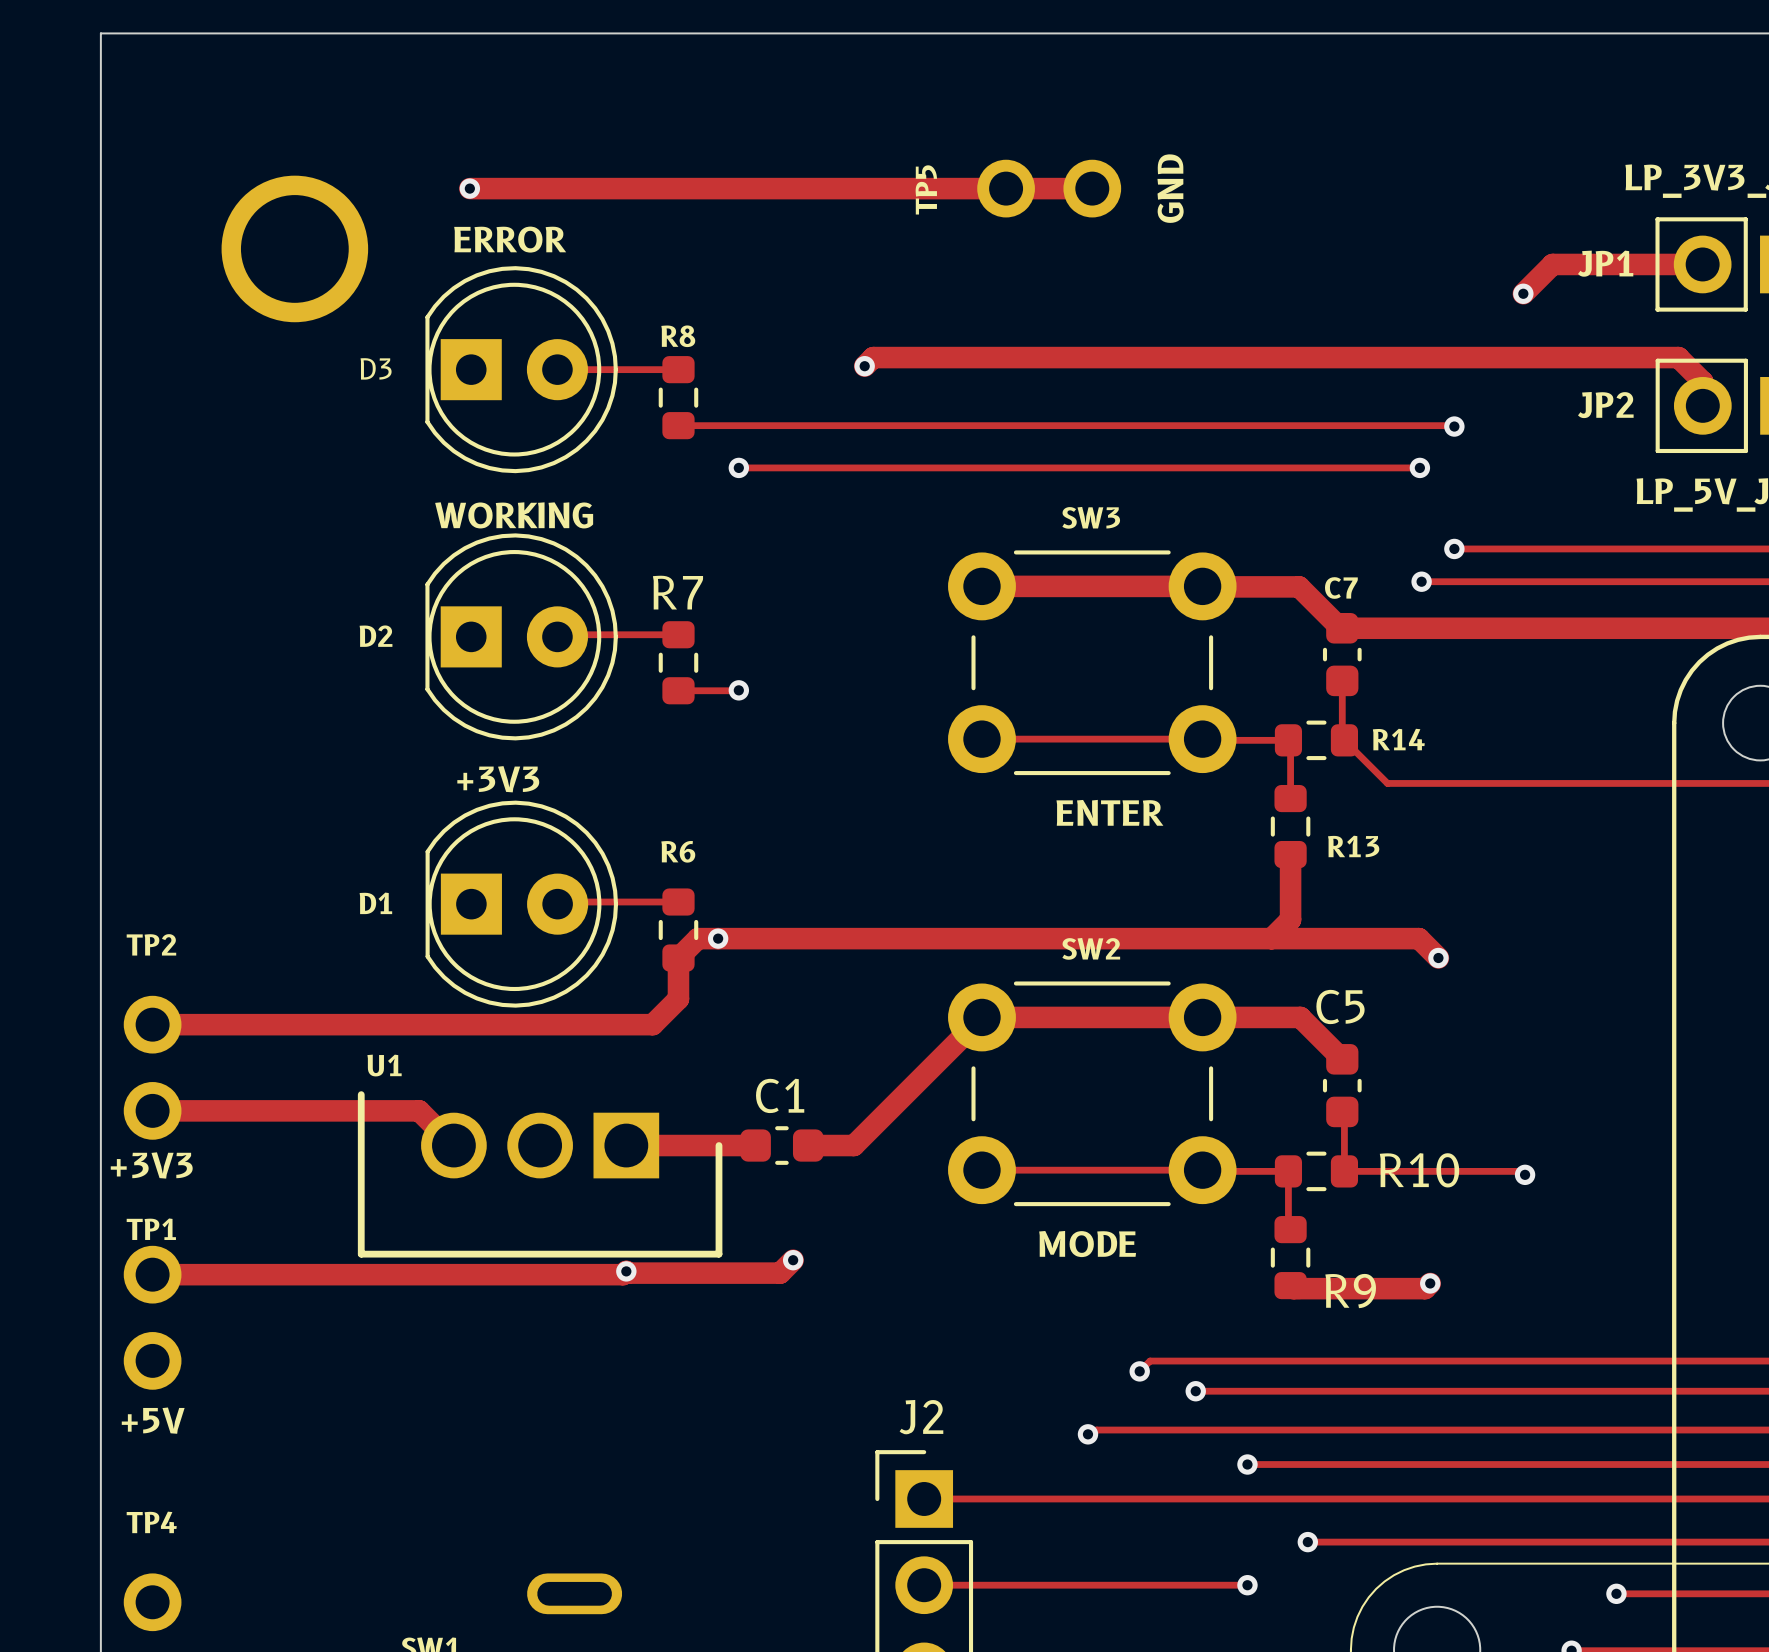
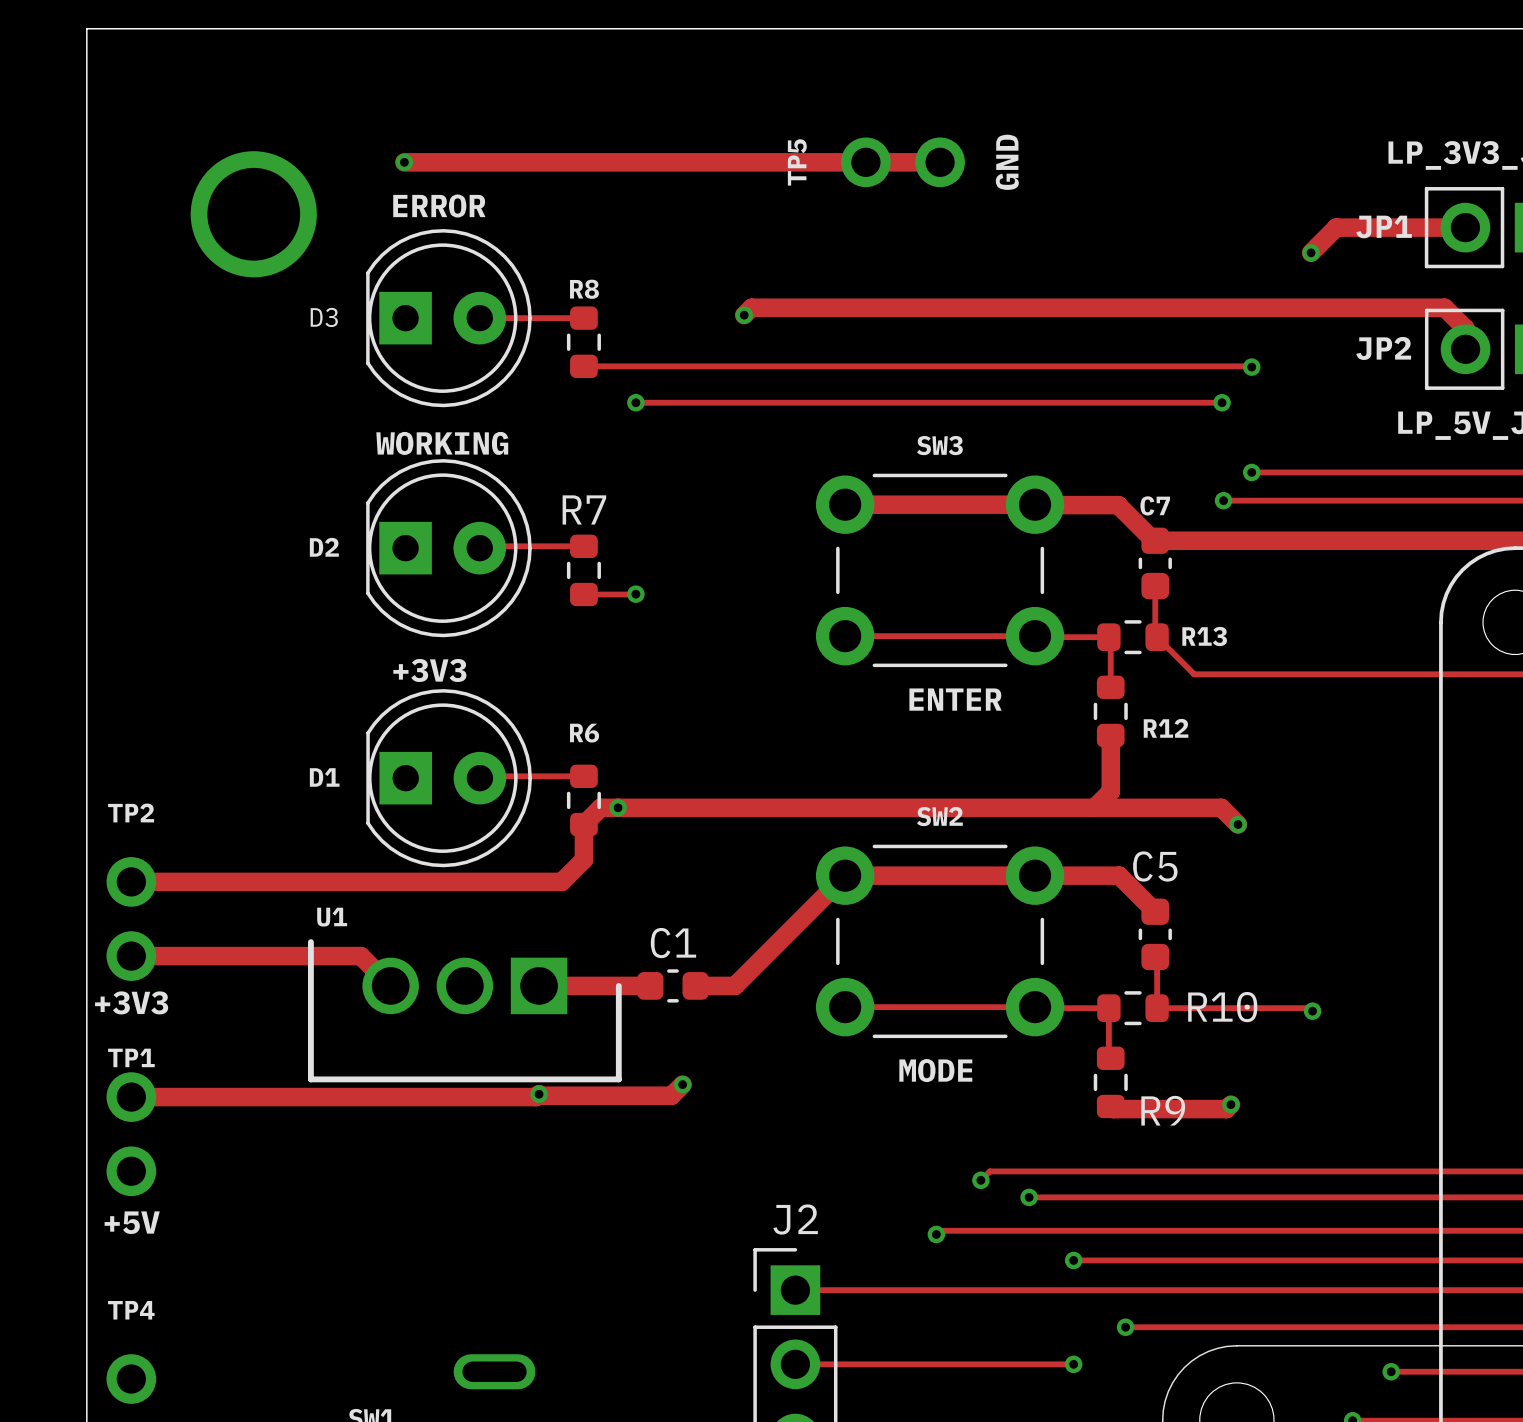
R14 name: R14 (1398, 739) -> R13 (1204, 636)
R13 name: R13 (1353, 846) -> R12 (1166, 728)

